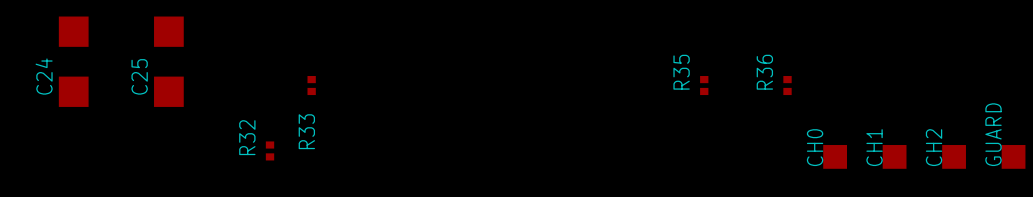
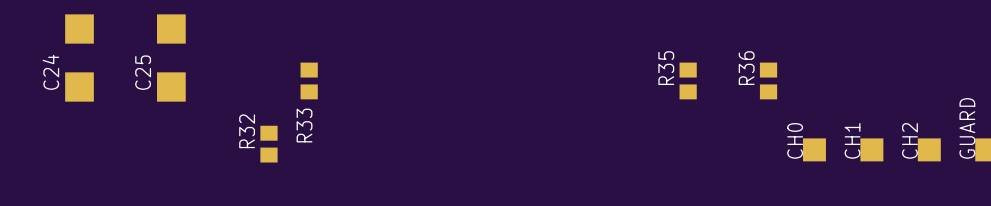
R33 footprint: [307, 76, 316, 96] -> [300, 62, 318, 100]
R35 footprint: [700, 76, 709, 96] -> [679, 62, 697, 100]
R36 footprint: [783, 76, 792, 96] -> [759, 62, 778, 100]
R32 footprint: [265, 141, 275, 161] -> [260, 125, 278, 163]

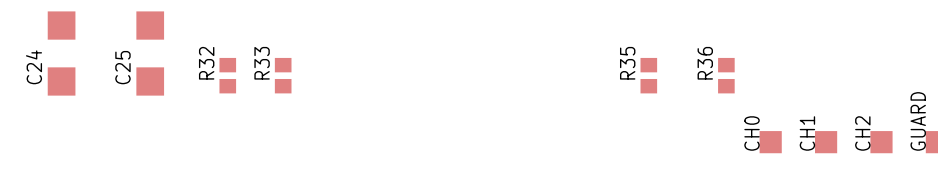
R33 name position: R33 (304, 125) -> R33 (262, 63)
R32 position: (268, 144) -> (227, 75)

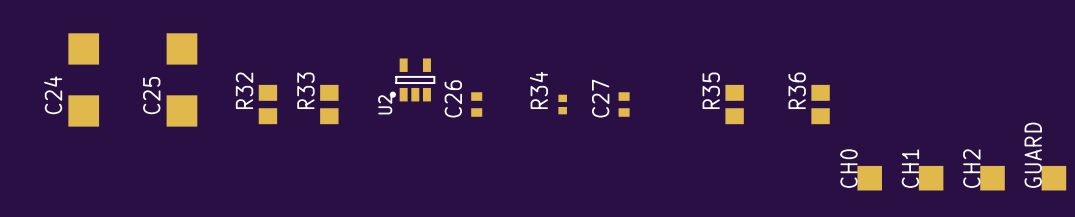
U2: none -> (412, 79)
C26: none -> (476, 104)
R34: none -> (562, 104)
C27: none -> (624, 104)

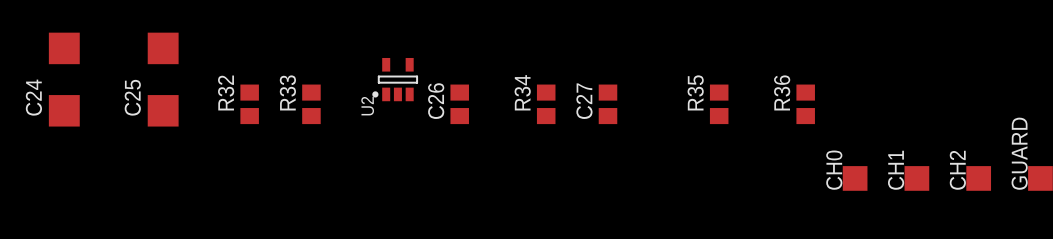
C26 footprint: [471, 92, 483, 117] -> [450, 84, 469, 125]
C27 footprint: [618, 92, 630, 117] -> [598, 84, 618, 125]
R34 footprint: [558, 94, 567, 115] -> [536, 84, 556, 125]

